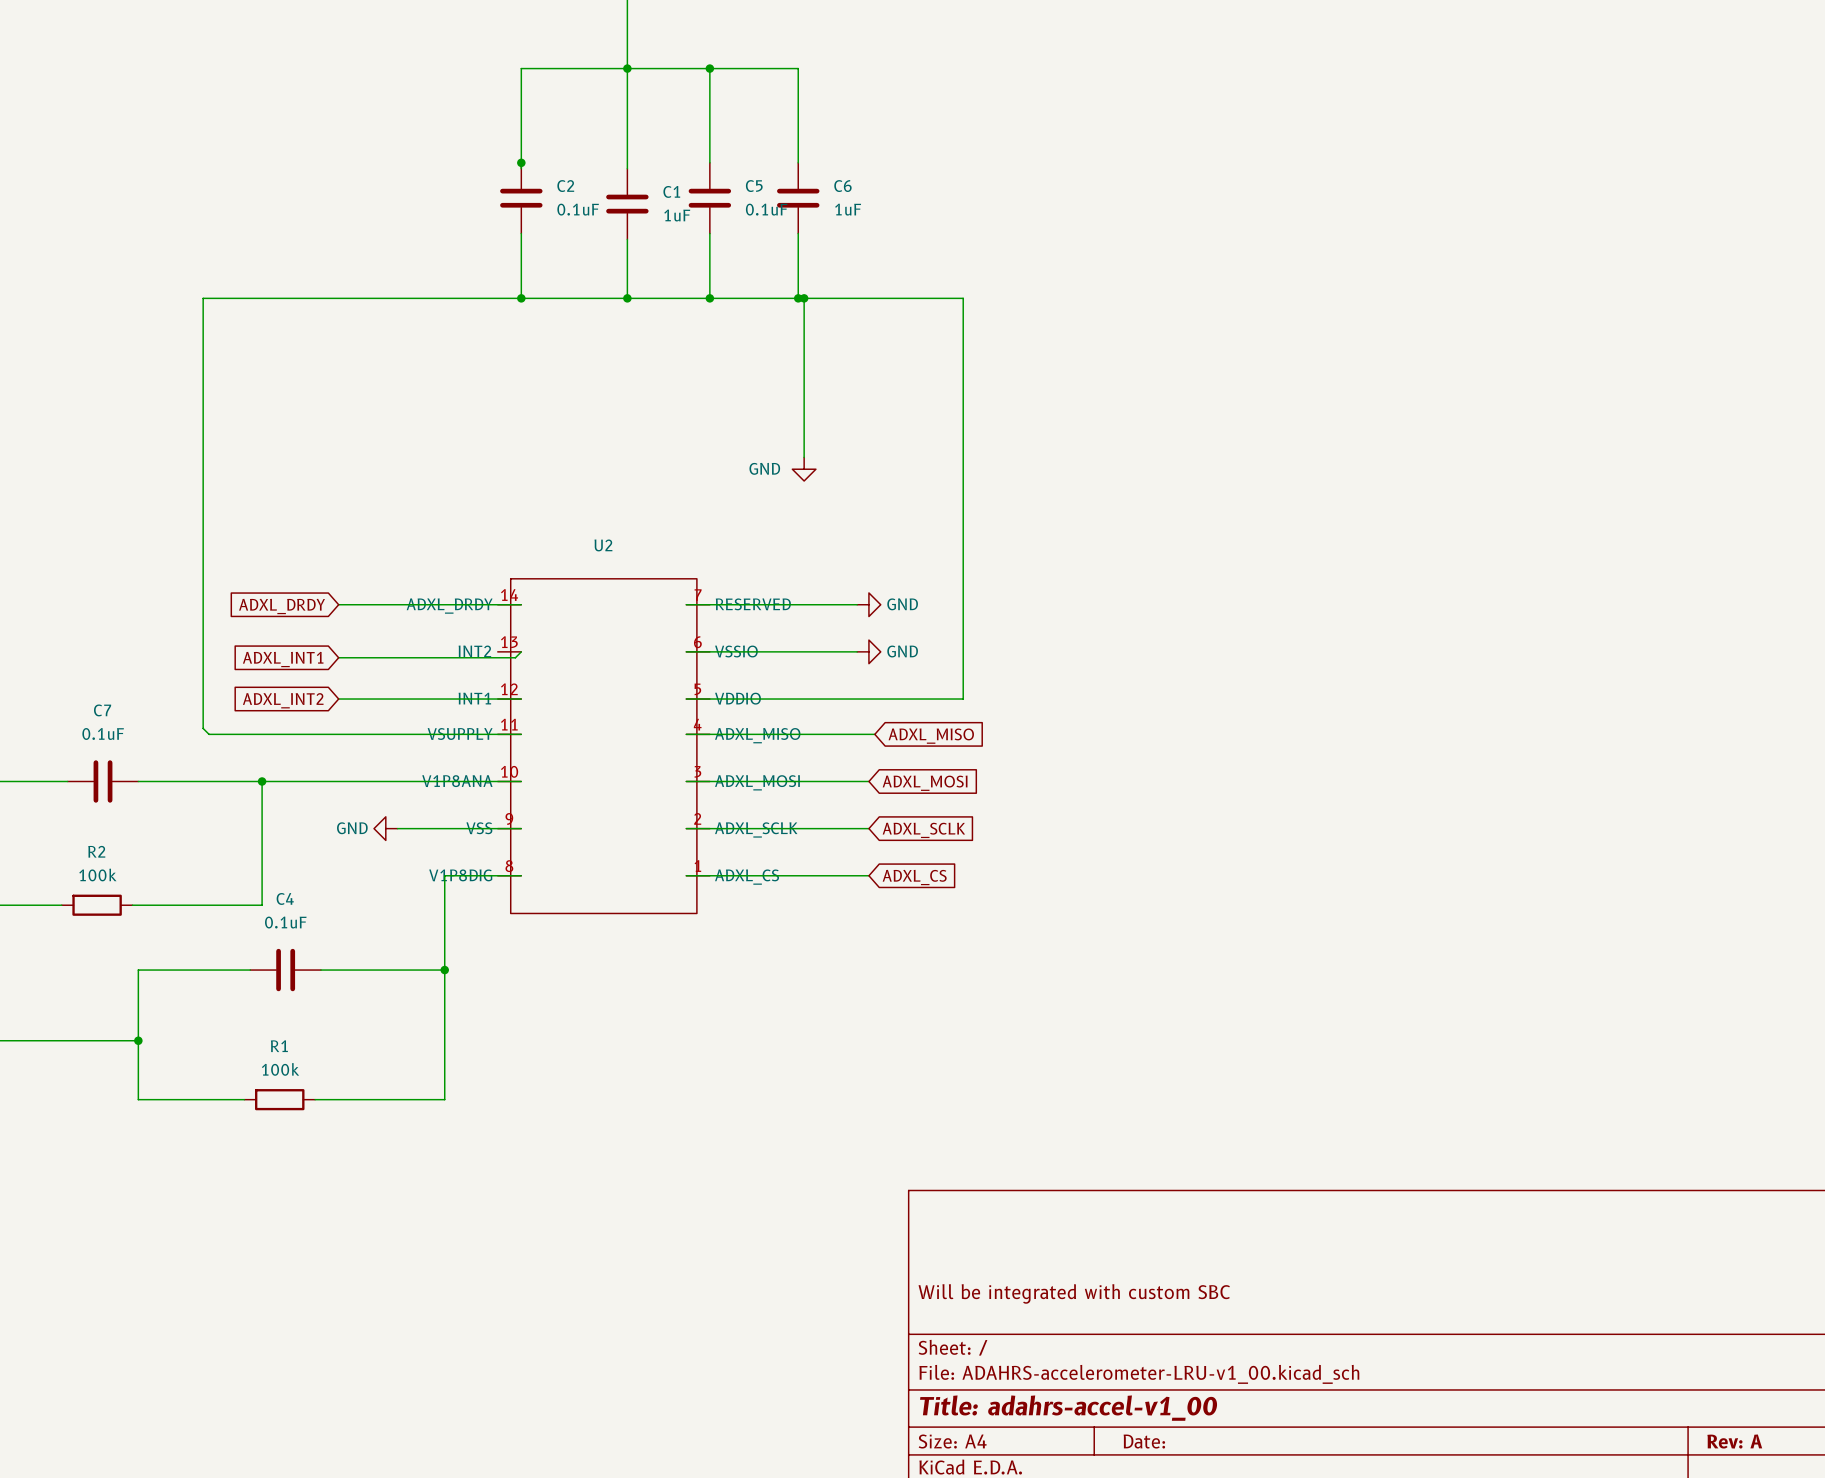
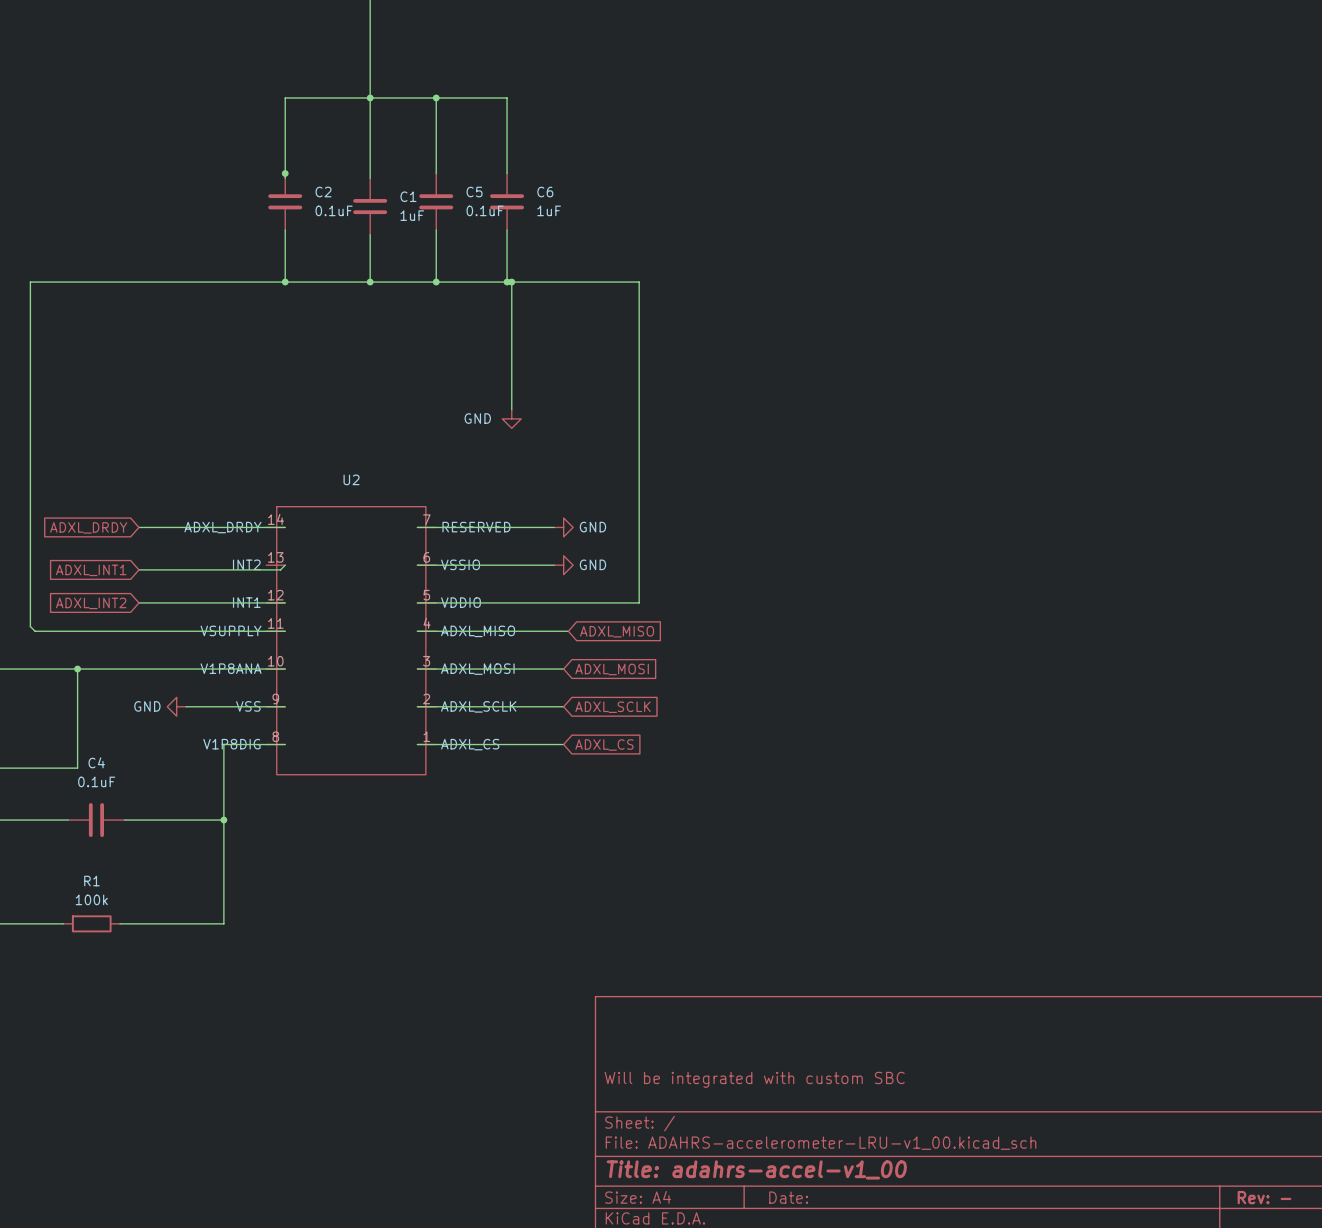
title block: Rev: A (1734, 1441) -> Rev: - (1264, 1197)

